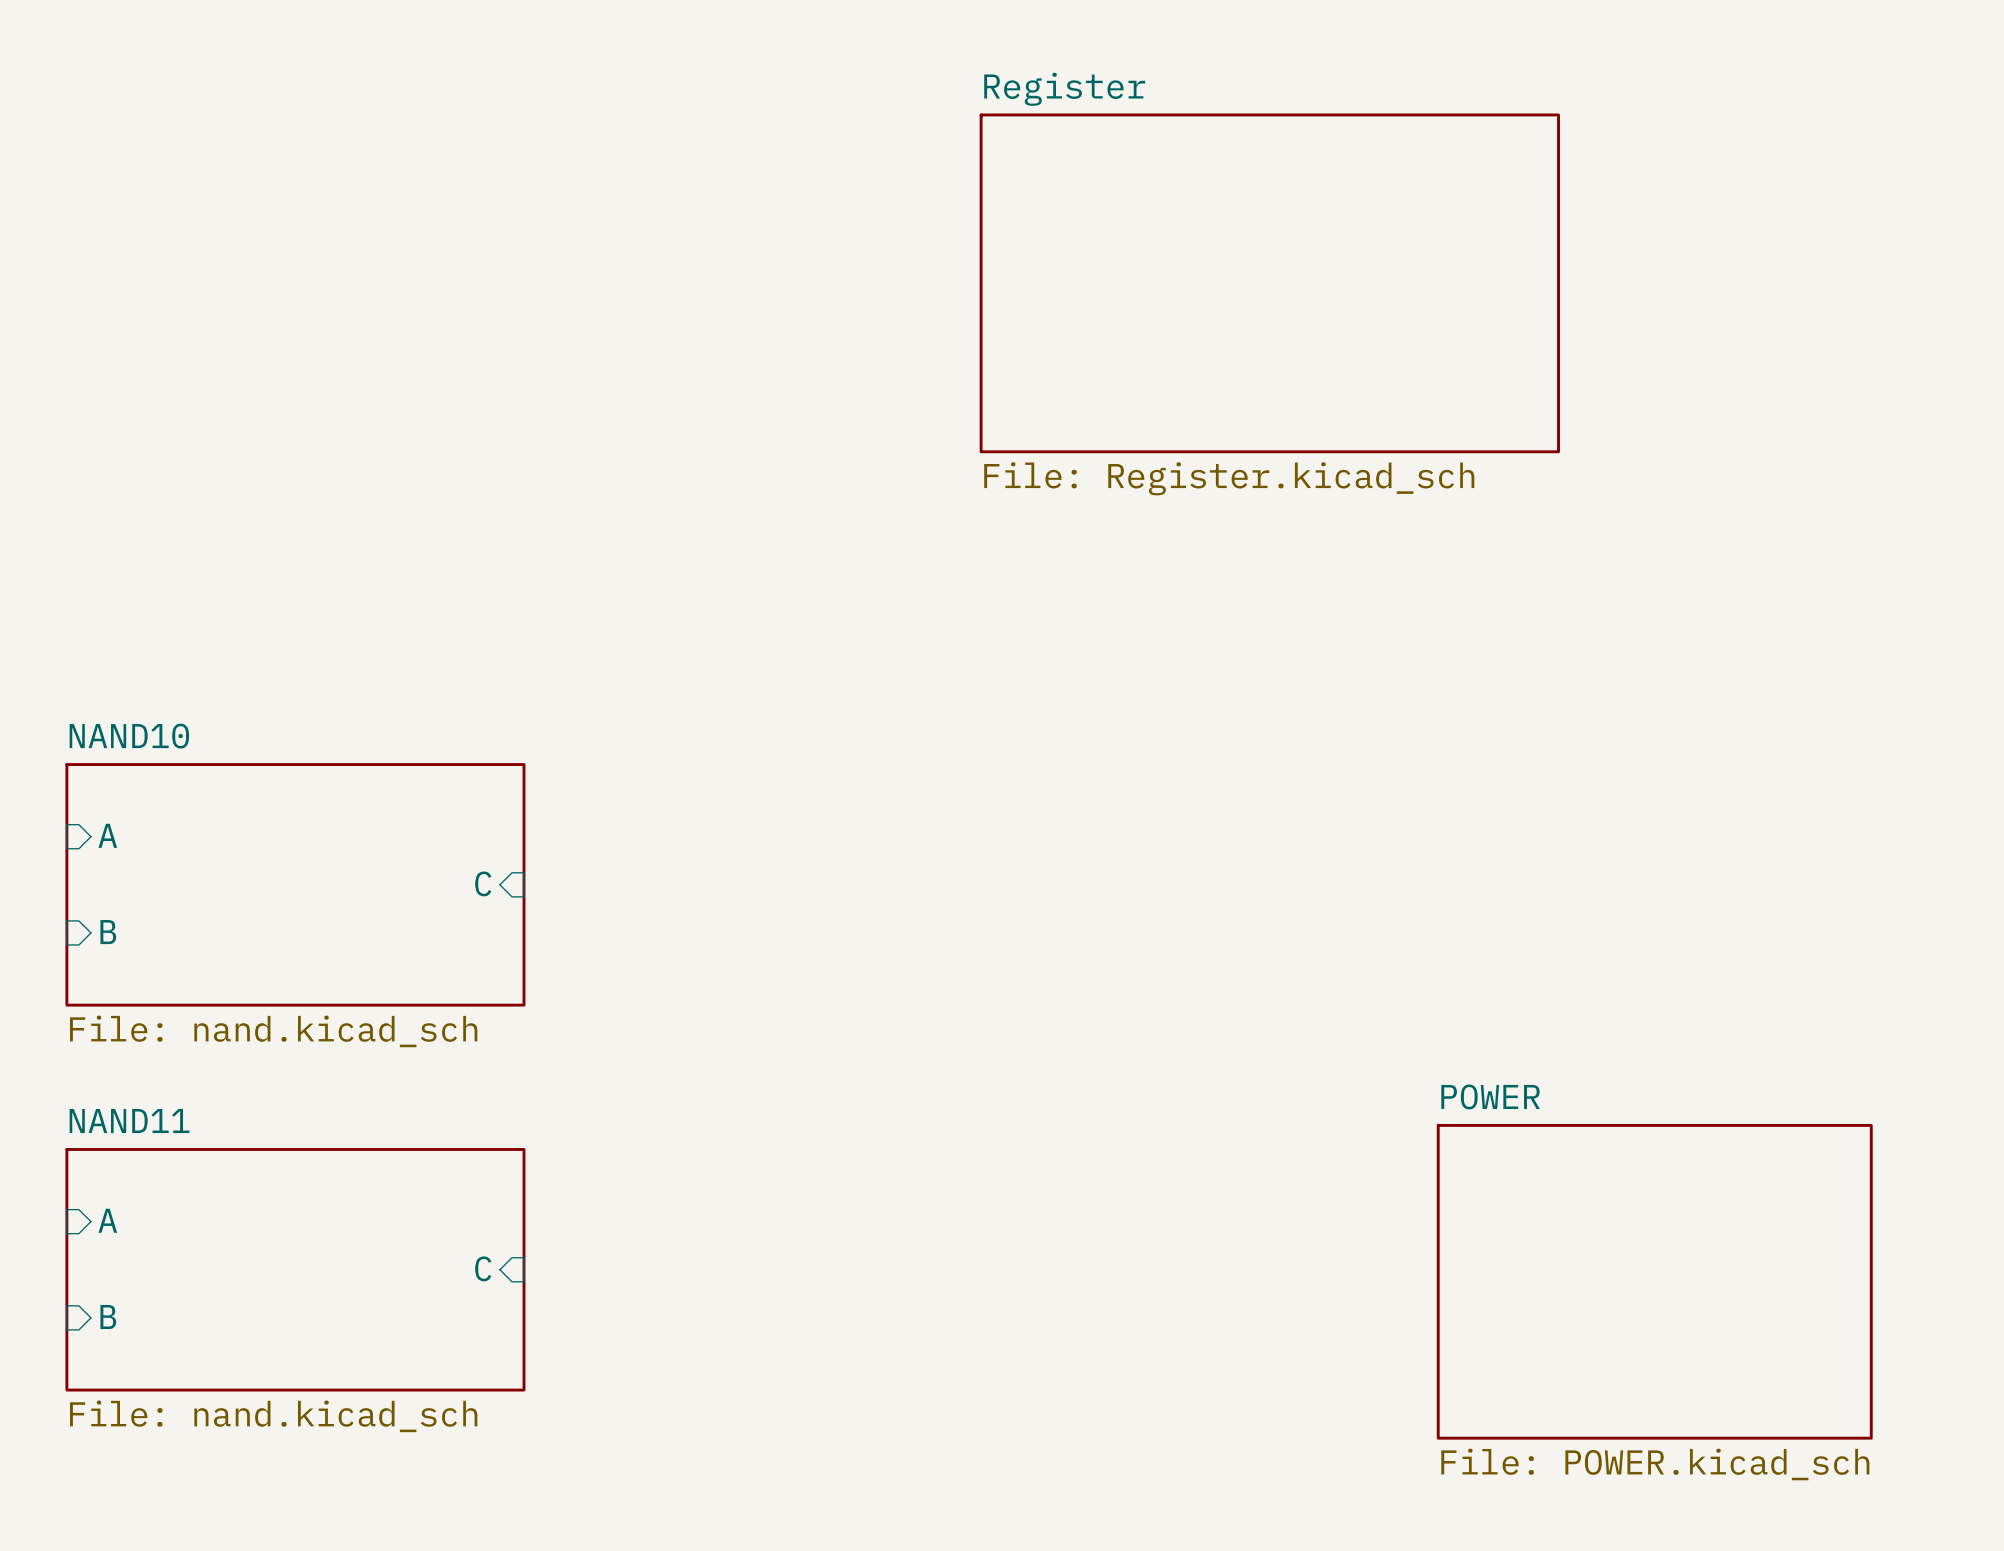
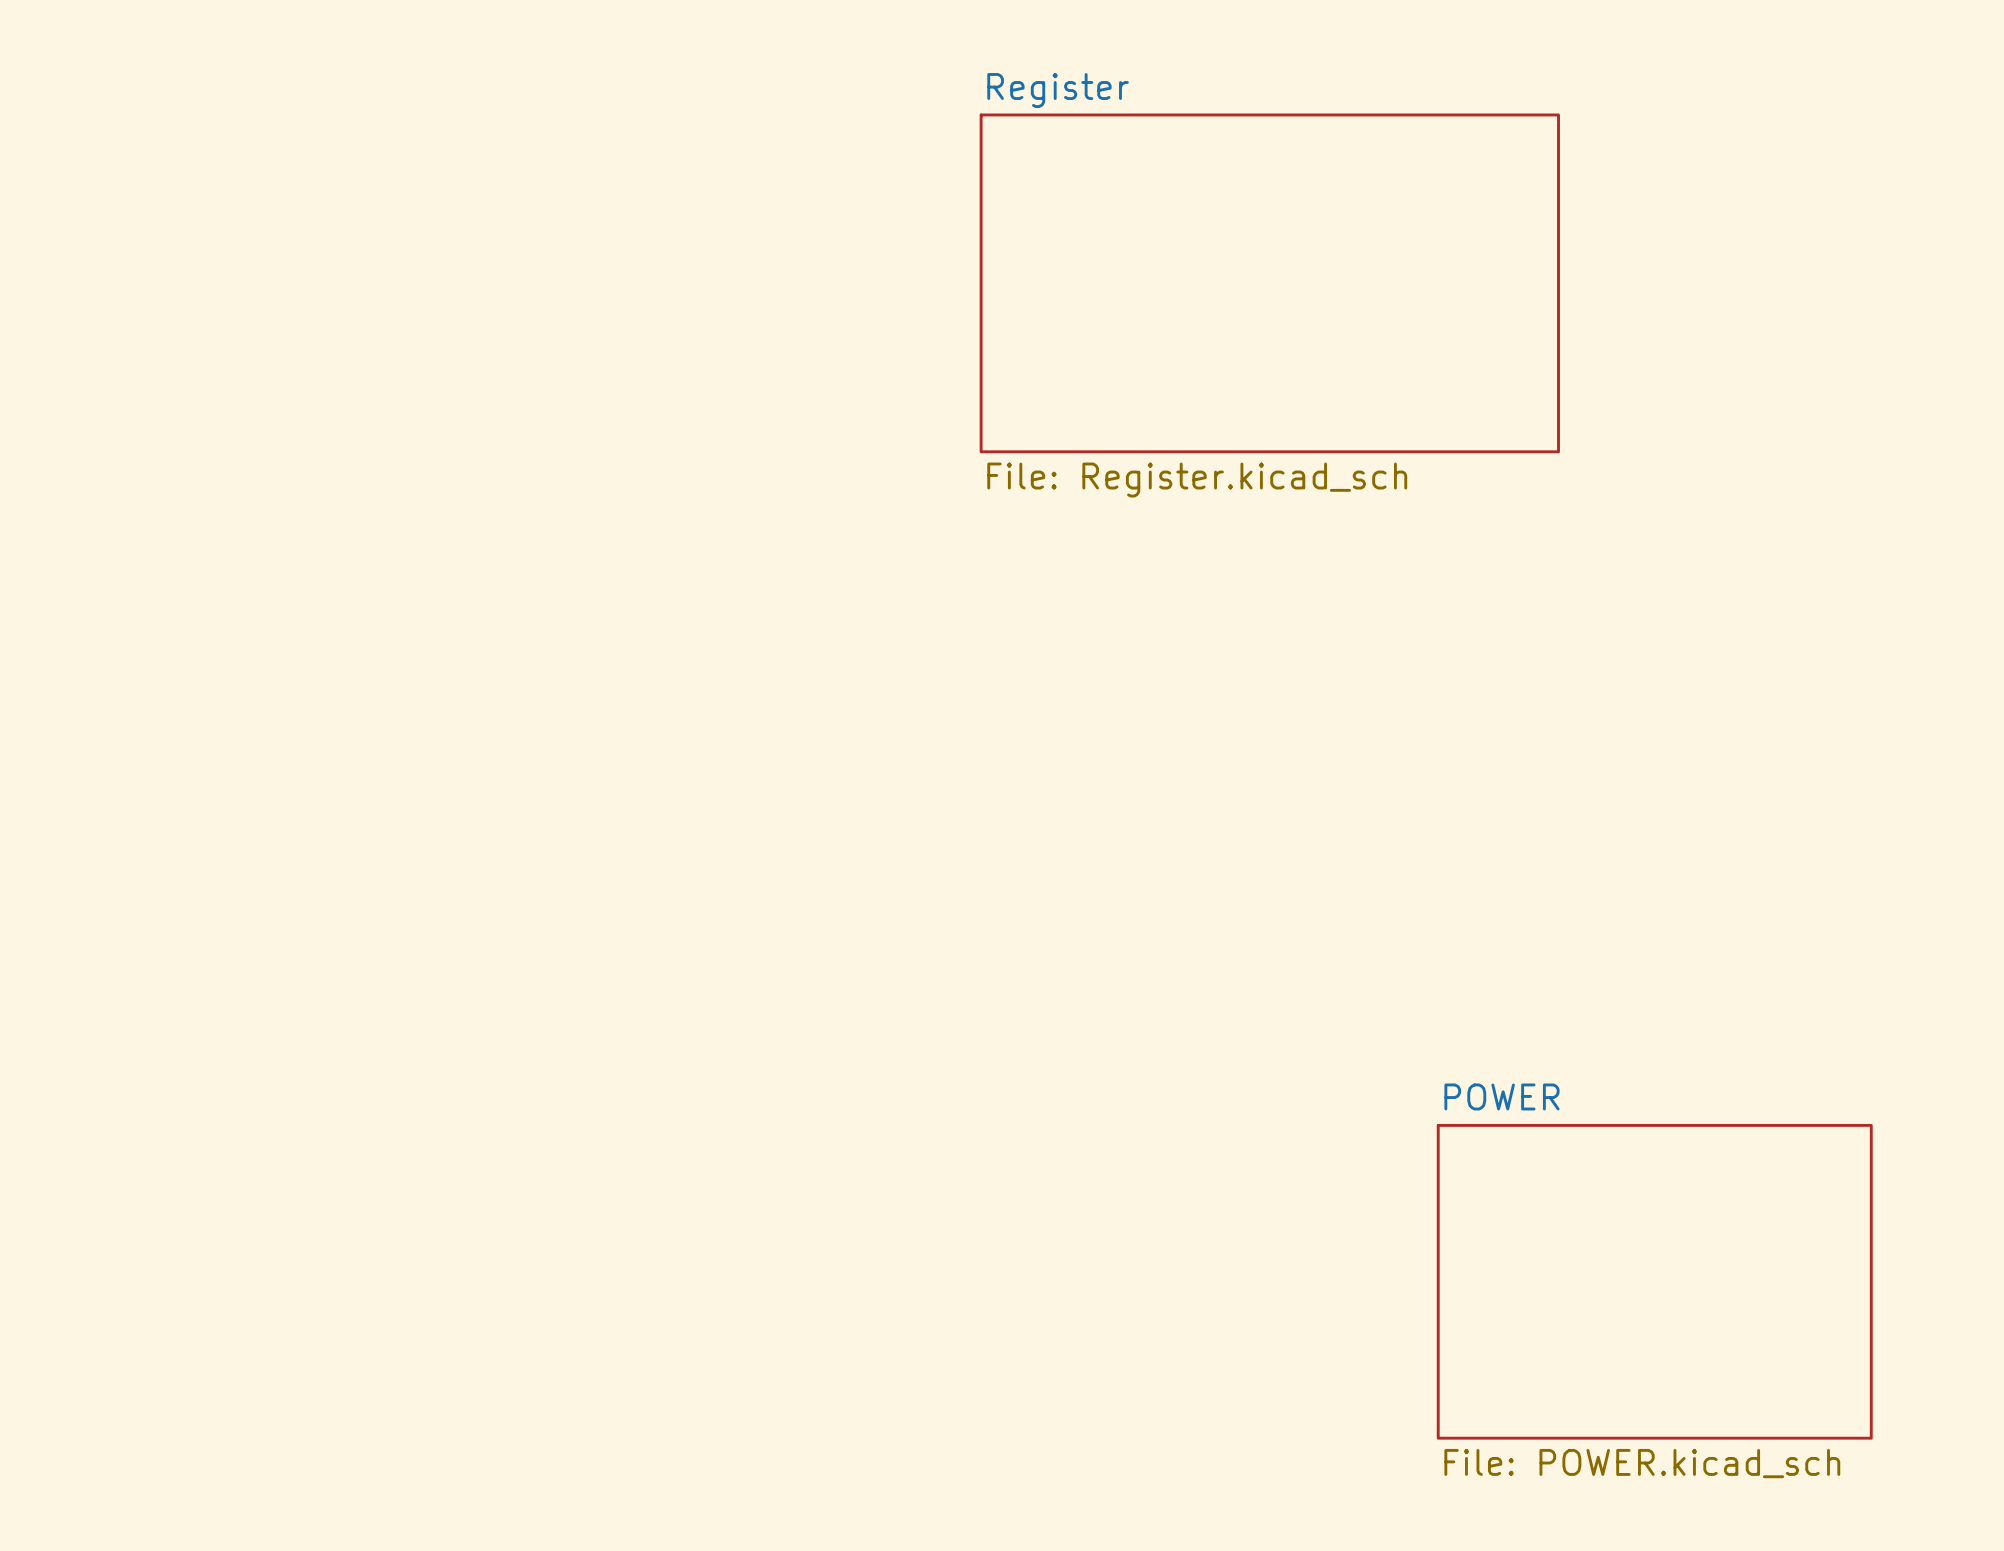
sheet pin: A (107, 835) -> none
sheet pin: C (483, 883) -> none
sheet NAND10: File: nand.kicad_sch (295, 884) -> none
sheet pin: B (108, 932) -> none
sheet pin: A (107, 1220) -> none
sheet pin: C (483, 1268) -> none
sheet NAND11: File: nand.kicad_sch (295, 1269) -> none
sheet pin: B (108, 1316) -> none

